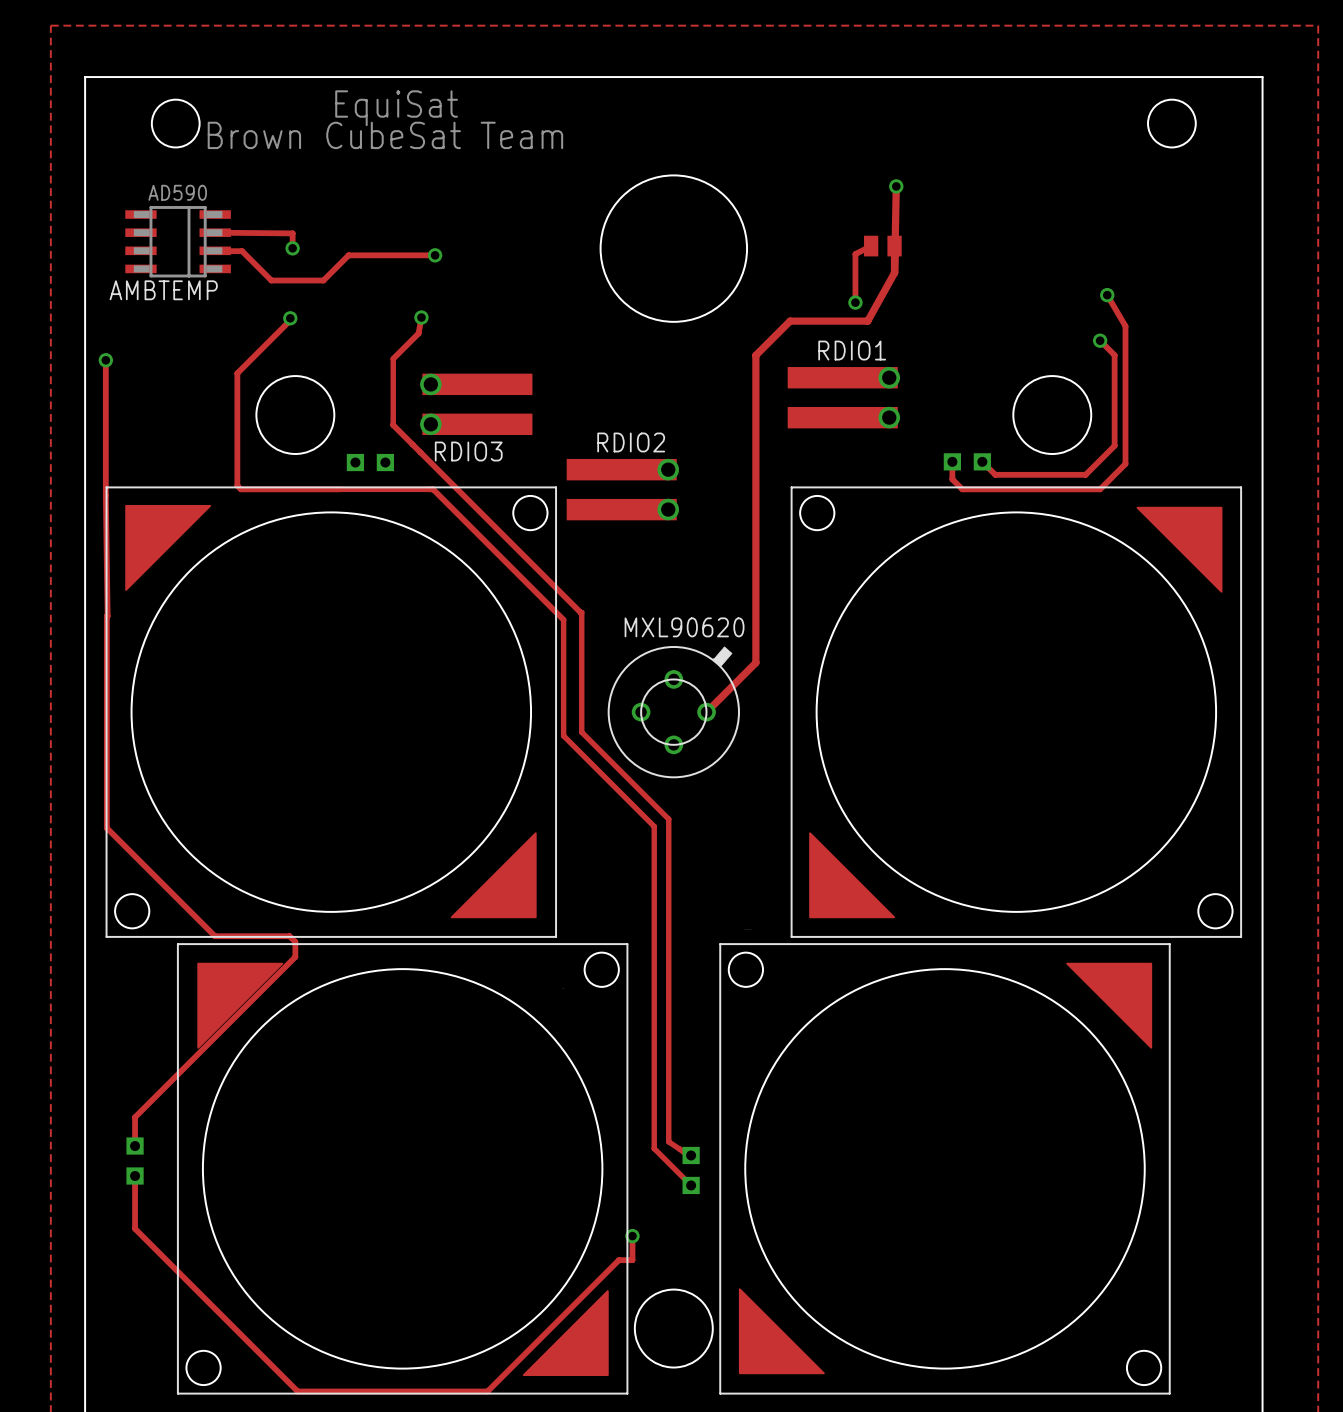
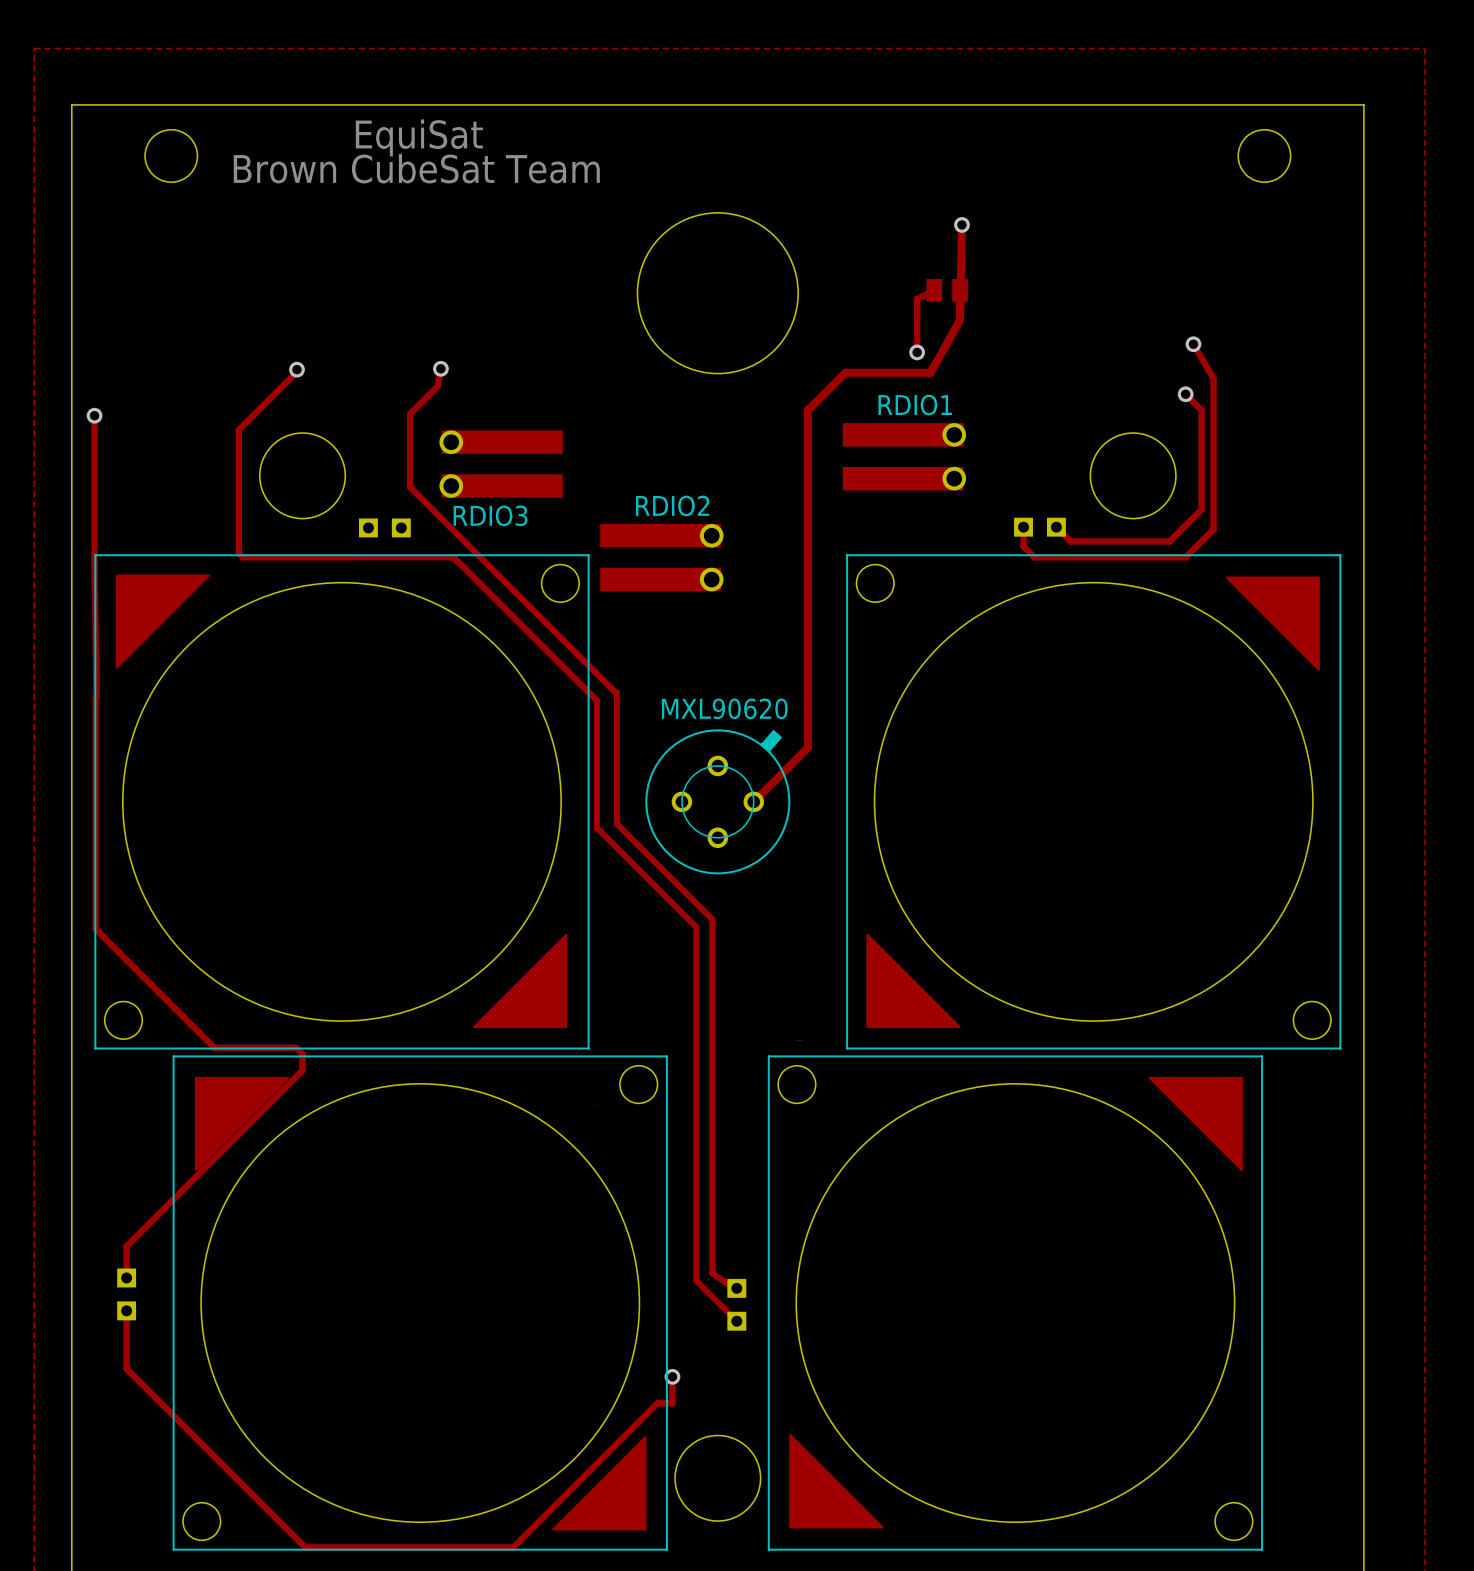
track: (215, 232) (292, 233) (292, 248) -> none
AMBTEMP: AD590 (178, 241) -> none
via: (292, 248) -> none
track: (215, 250) (242, 251) (271, 280) (323, 280) (348, 255) (435, 255) -> none
via: (435, 255) -> none

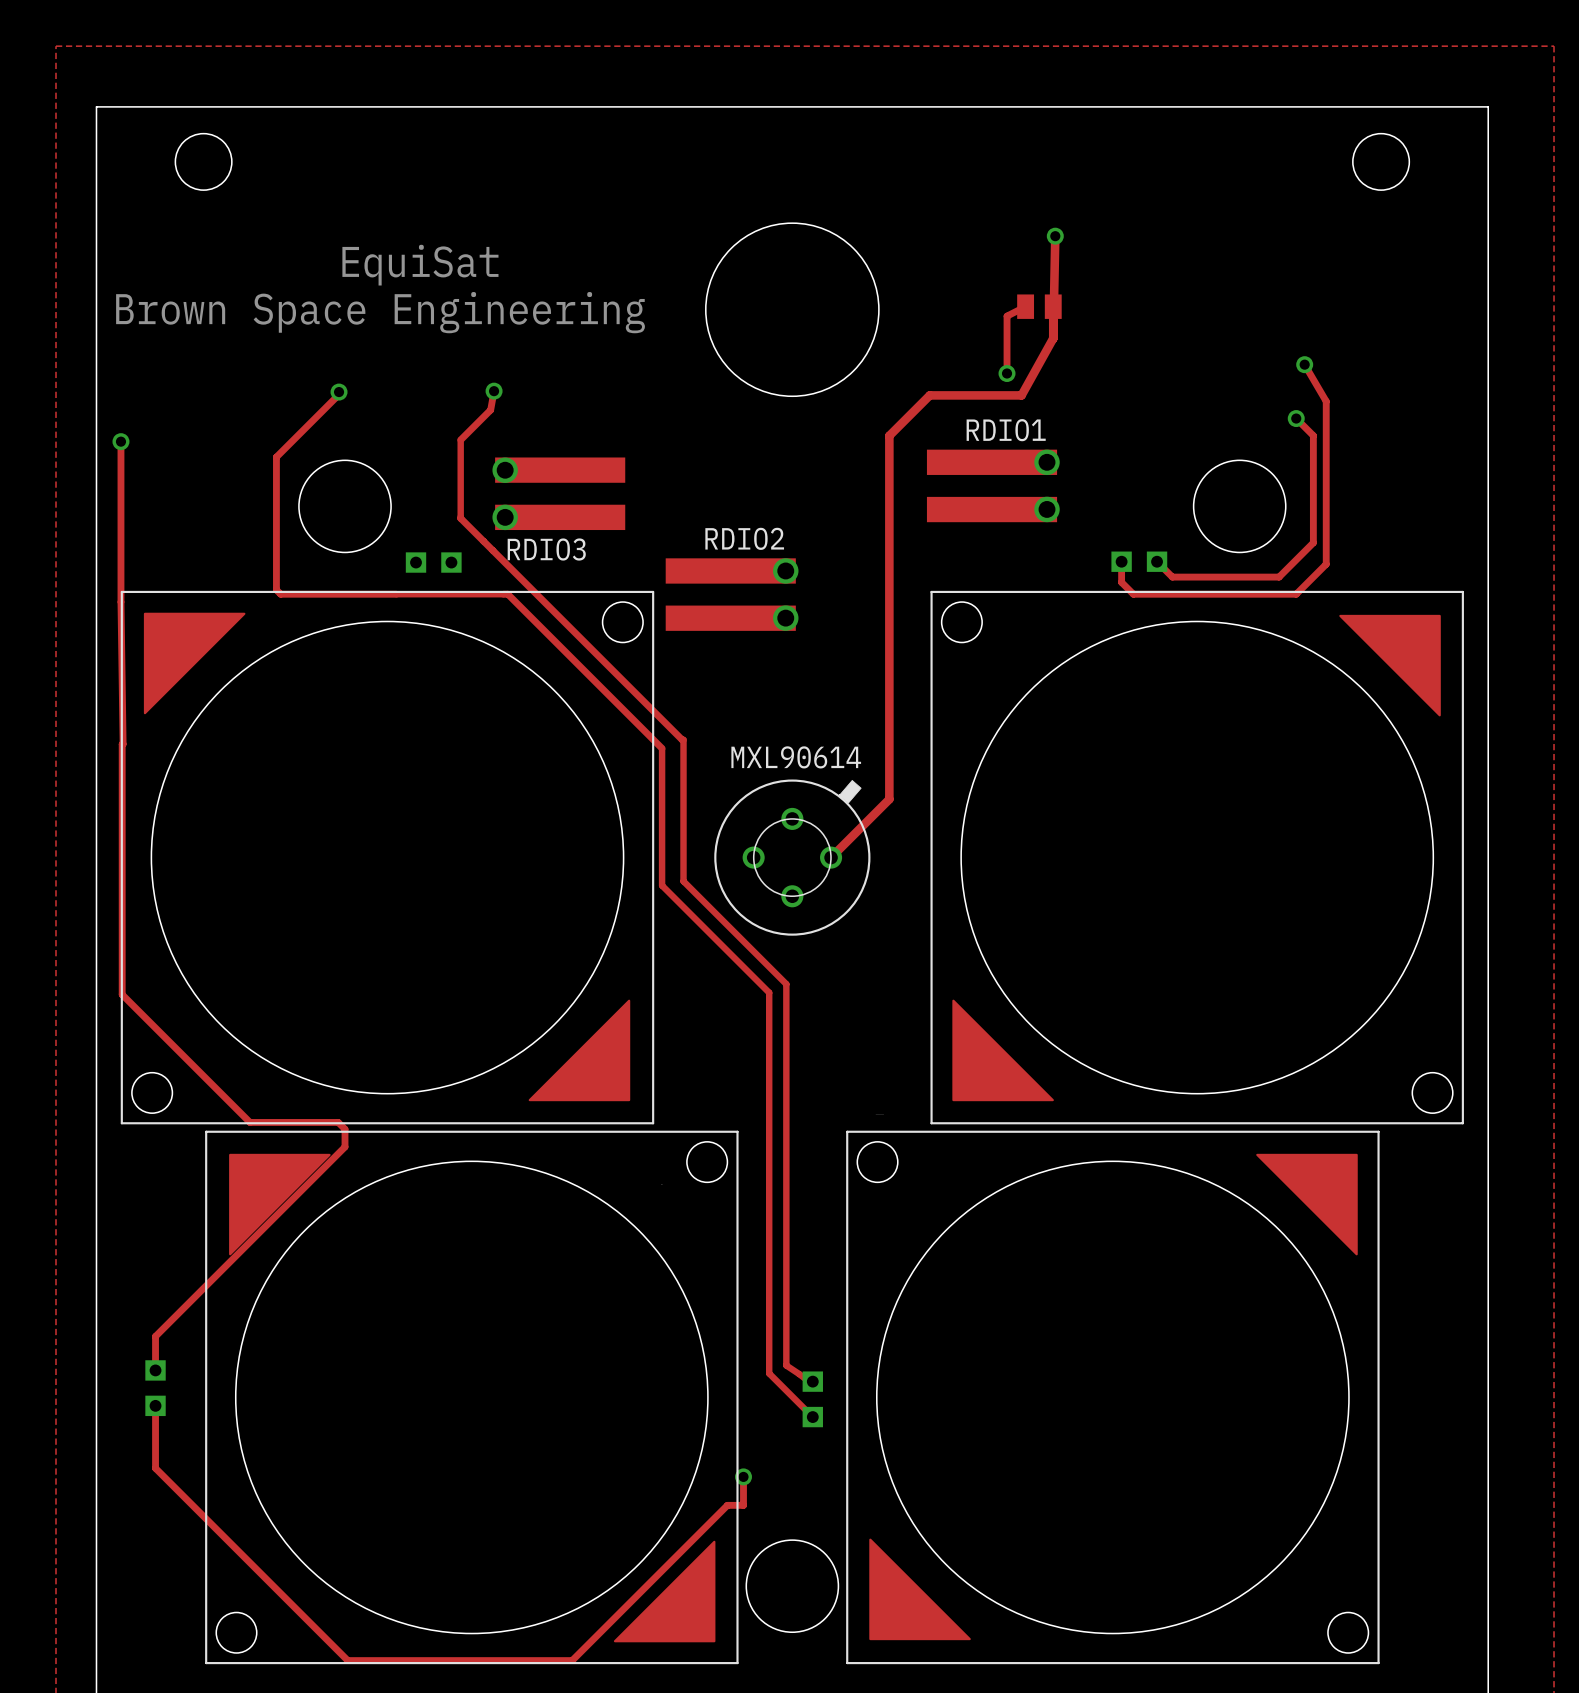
text position: EquiSat (419, 137) -> EquiSat (420, 265)
text: Brown CubeSat Team (416, 168) -> none
text: none -> Brown Space Engineering (380, 312)
part value: MXL90620 (724, 708) -> MXL90614 (796, 757)

